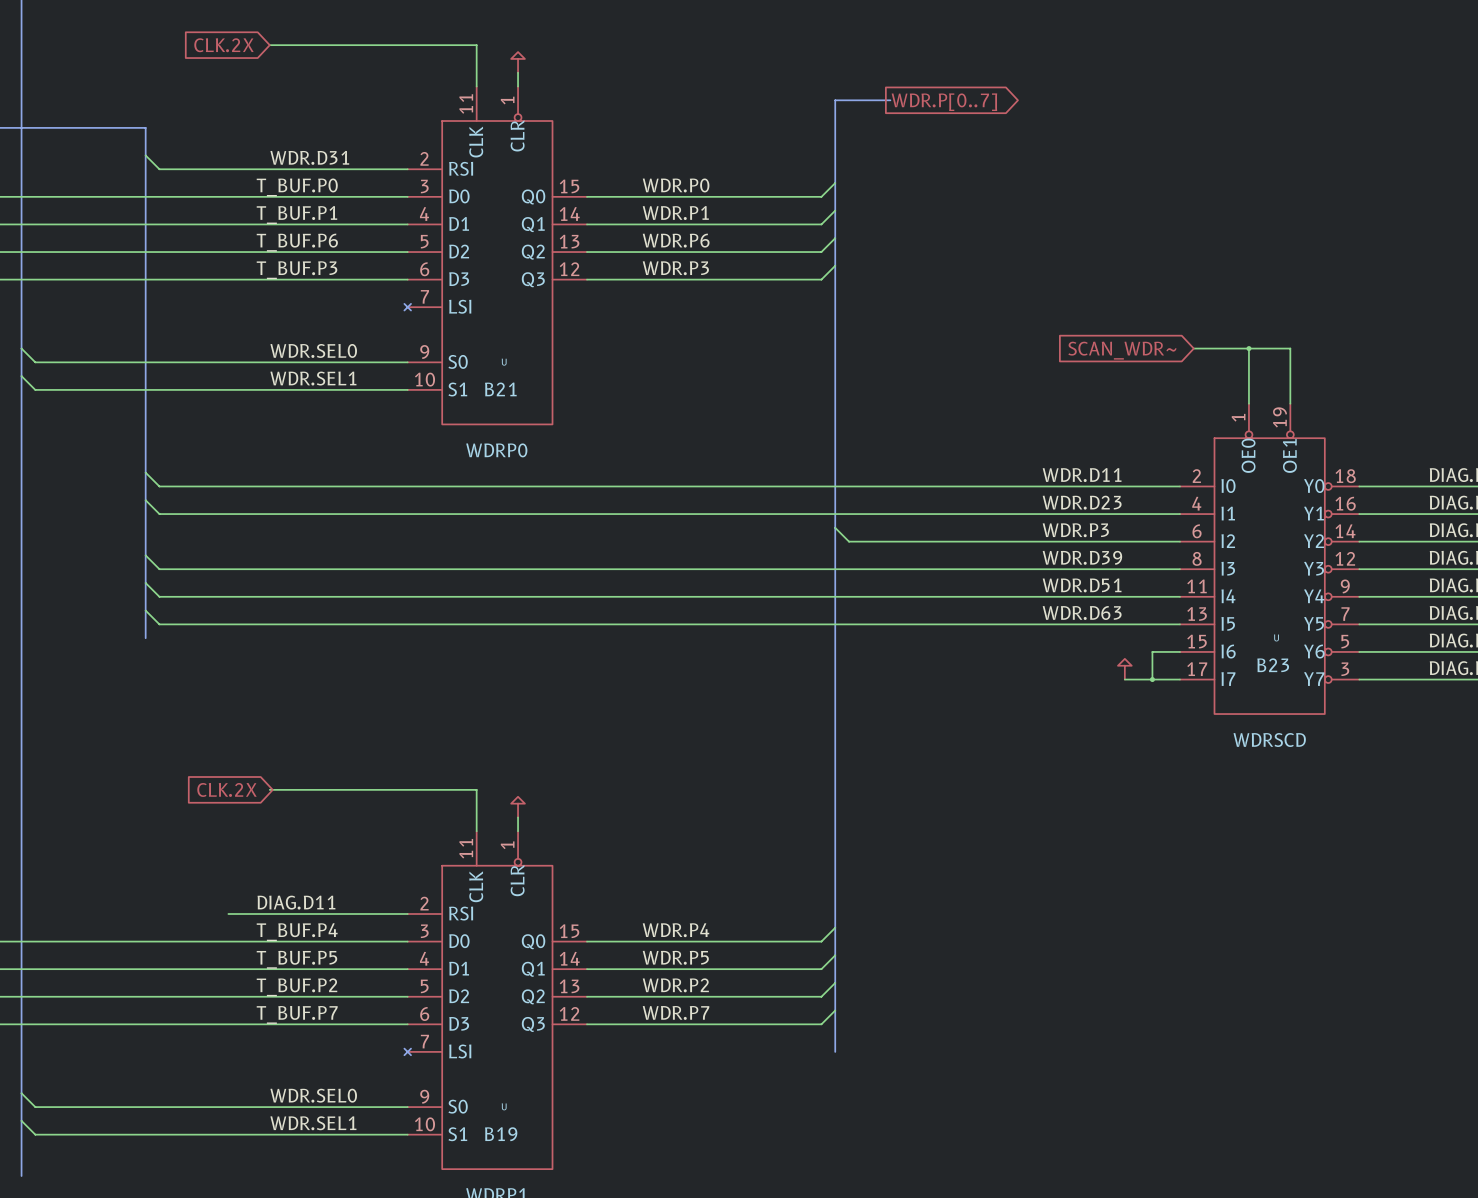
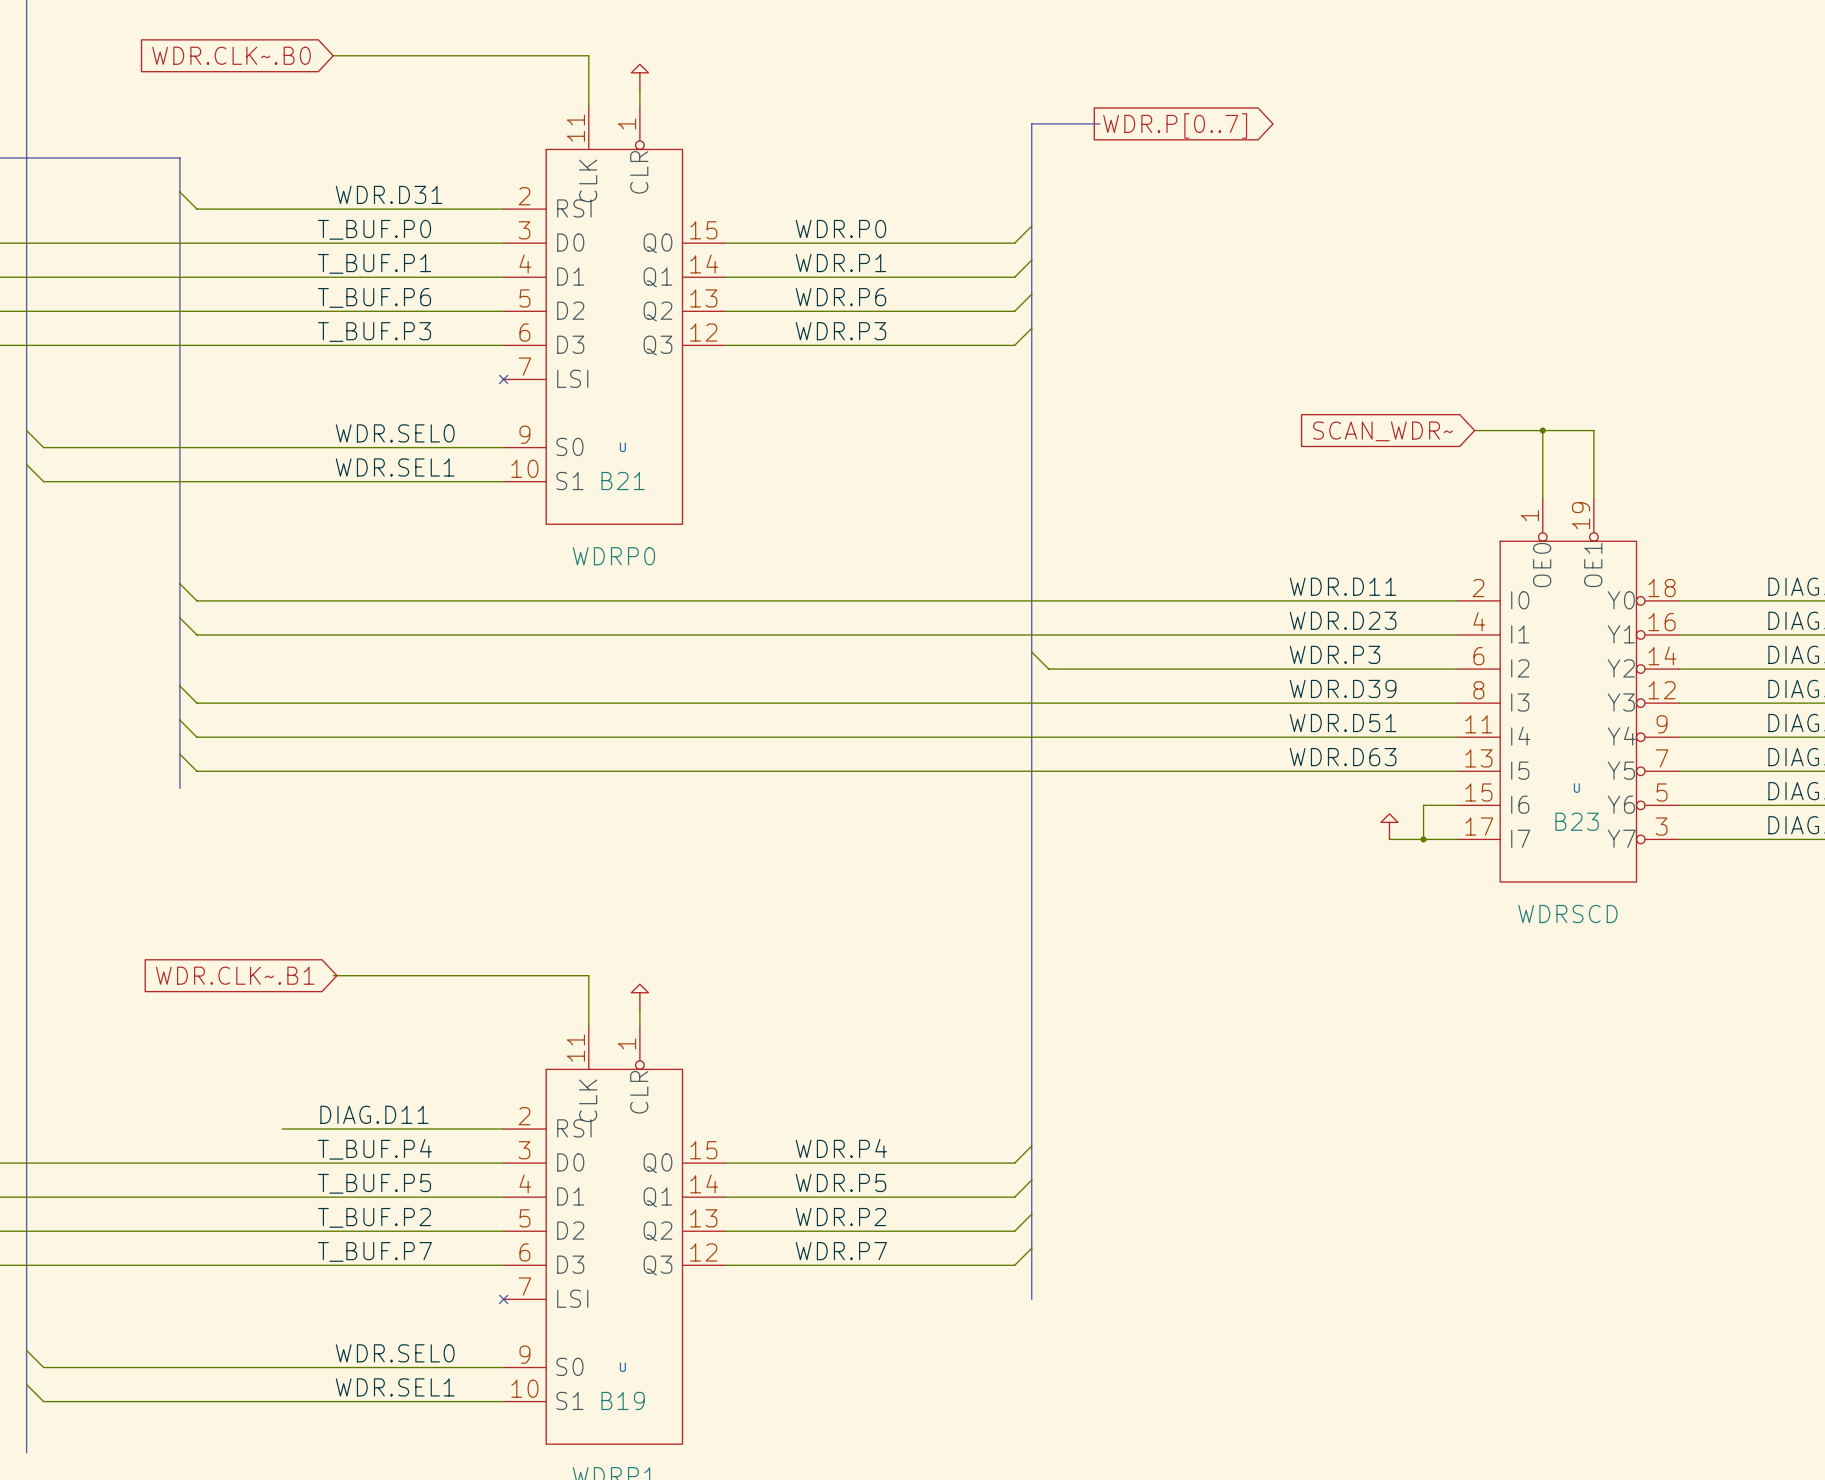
global label: CLK.2X (223, 45) -> WDR.CLK~.B0 (231, 55)
global label: CLK.2X (226, 789) -> WDR.CLK~.B1 (235, 975)

